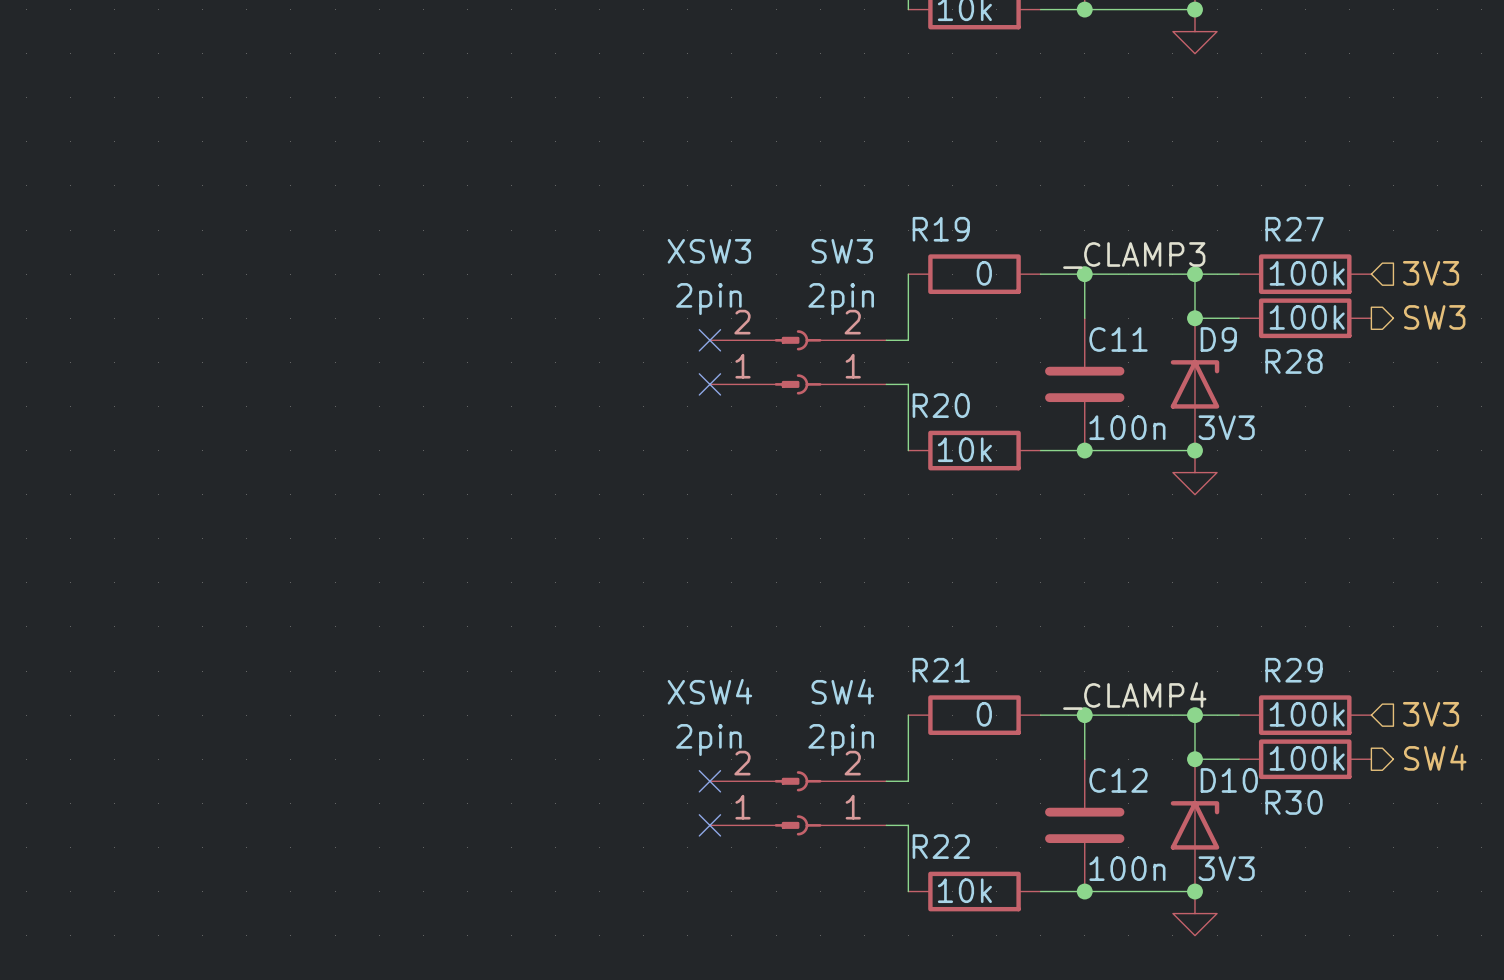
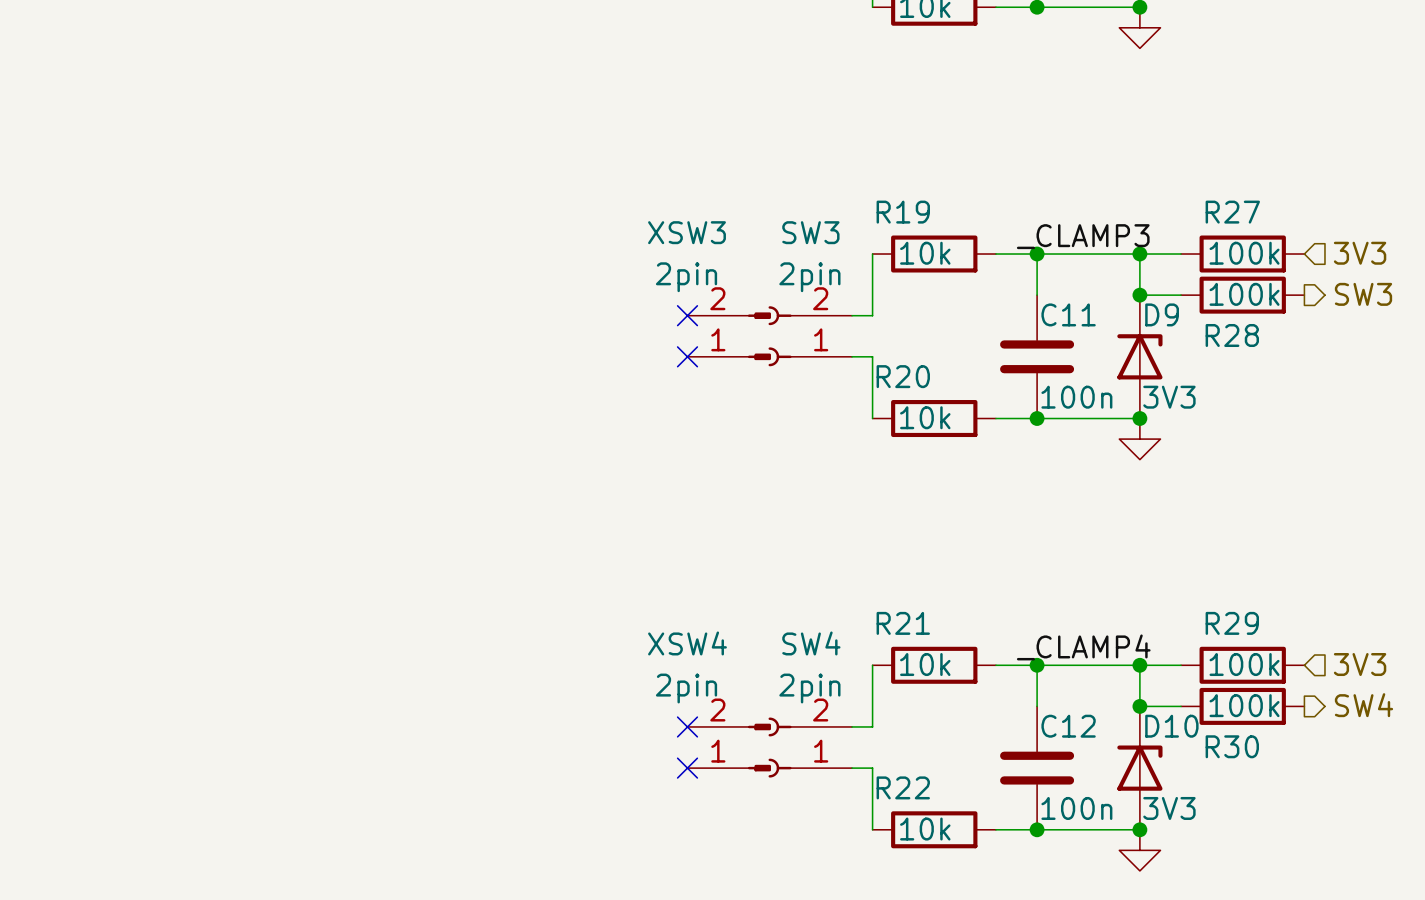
R19 value: 0 (984, 273) -> 10k (925, 253)
R21 value: 0 (984, 714) -> 10k (925, 664)

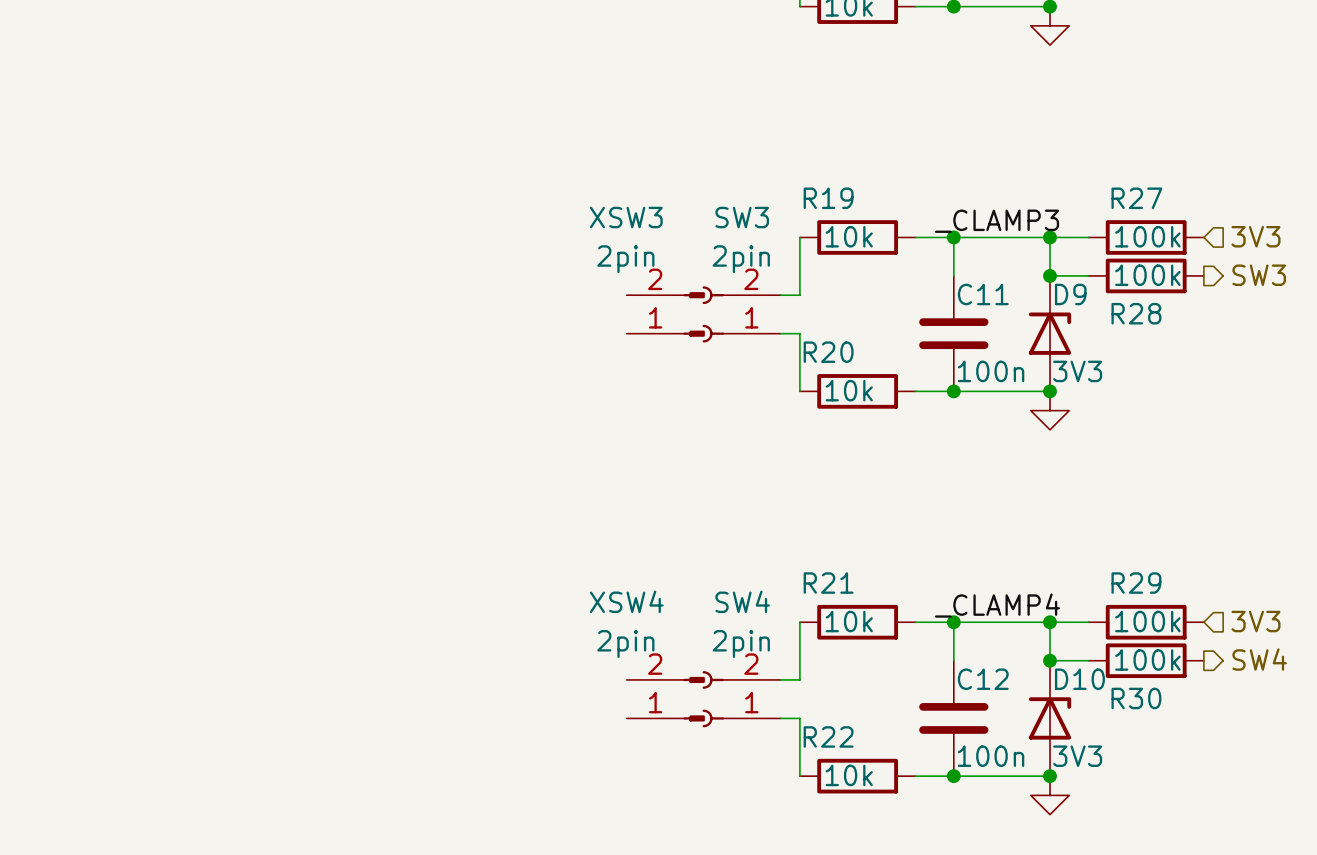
no-connect mark: (687, 315) -> none
no-connect mark: (687, 356) -> none
no-connect mark: (687, 726) -> none
no-connect mark: (687, 768) -> none

